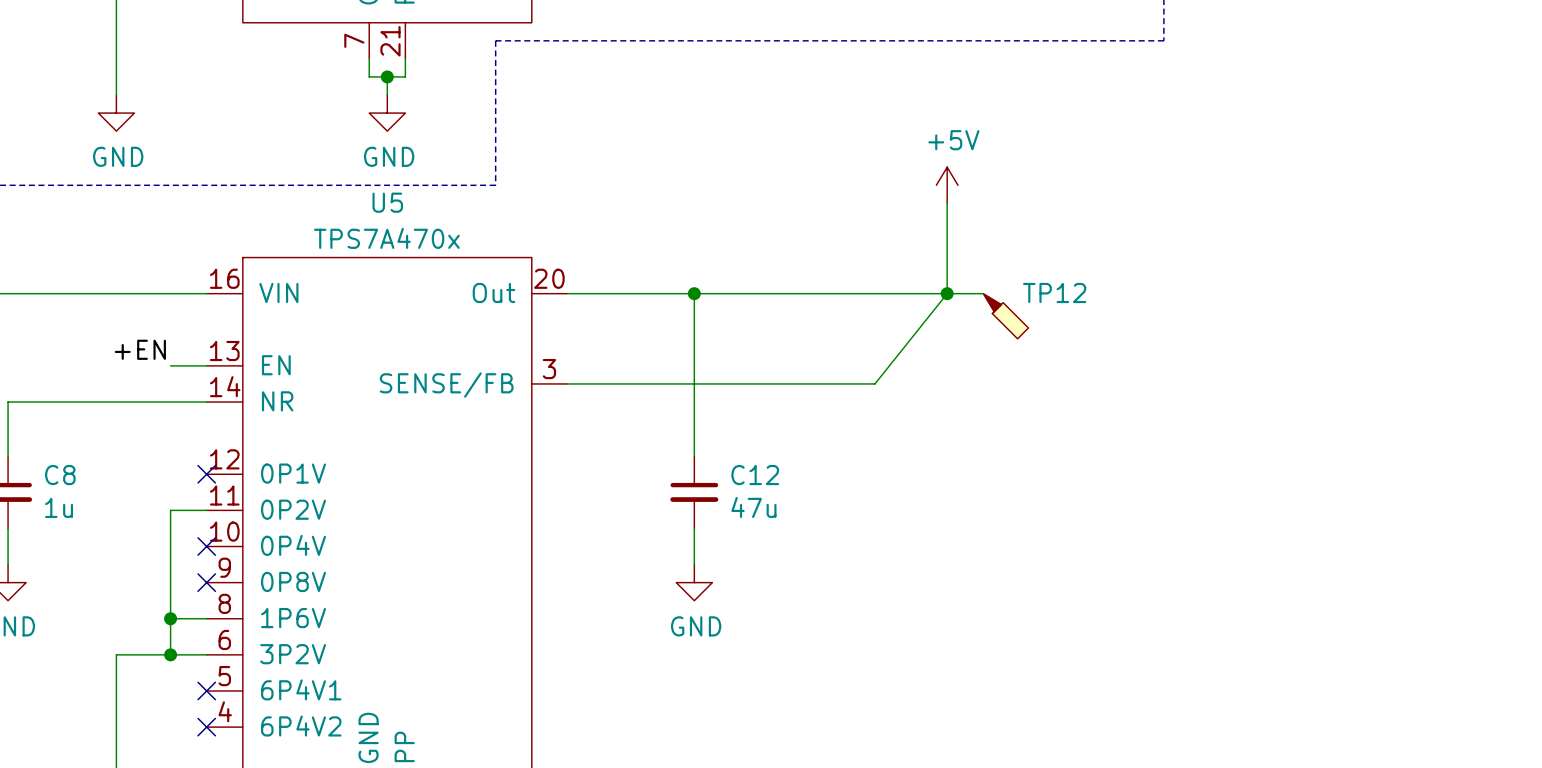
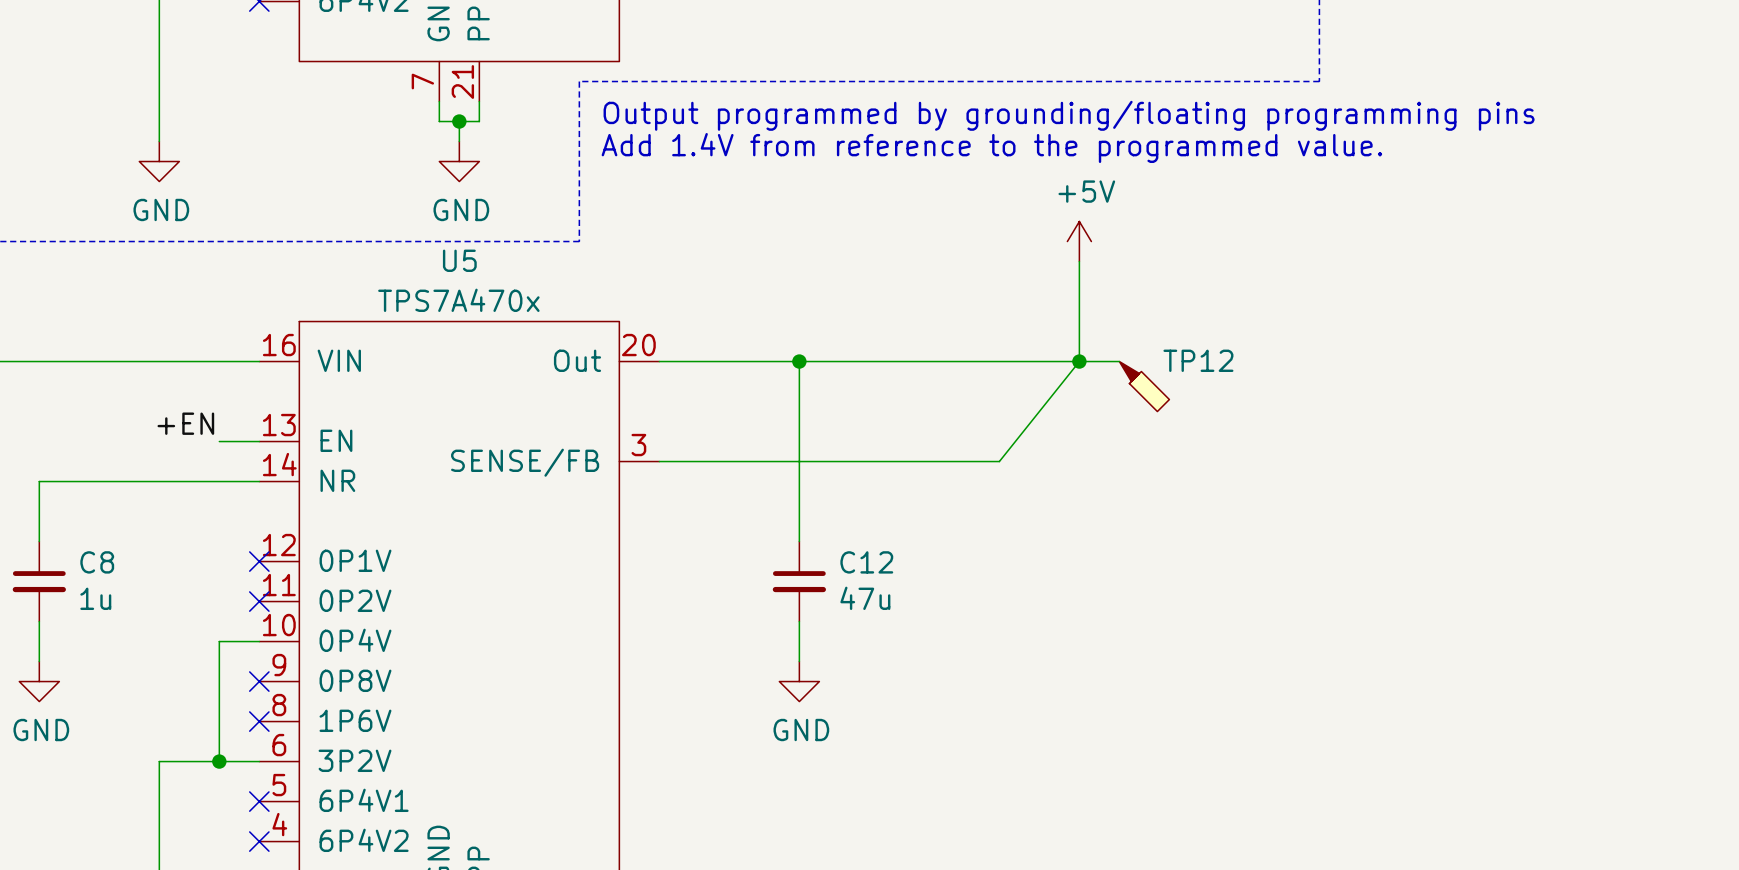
text: none -> Output programmed by grounding/floating programming pins (1069, 115)
text: none -> Add 1.4V from reference to the programmed value. (991, 147)
wire: (206, 510) (170, 510) (170, 546) -> (259, 641) (219, 641)
no-connect mark: none -> (259, 601)
no-connect mark: (206, 546) -> none
wire: (170, 618) (206, 618) -> none
junction: (170, 618) -> none
no-connect mark: none -> (259, 721)

